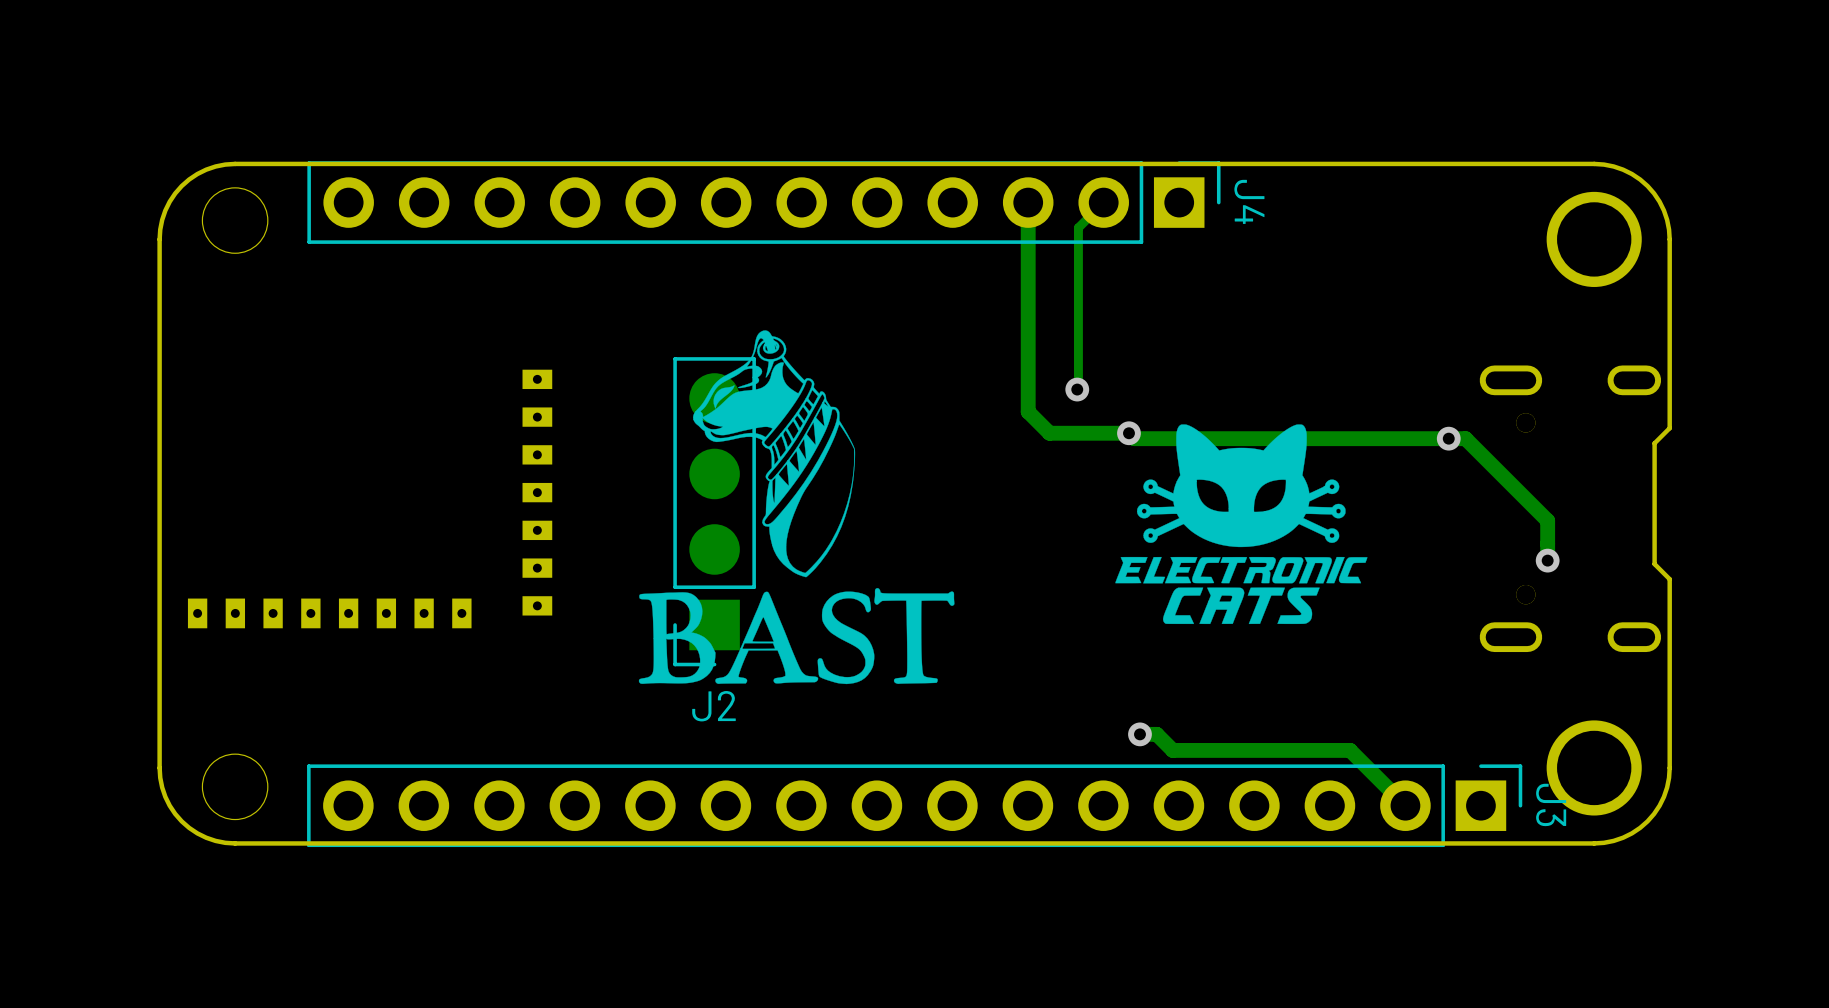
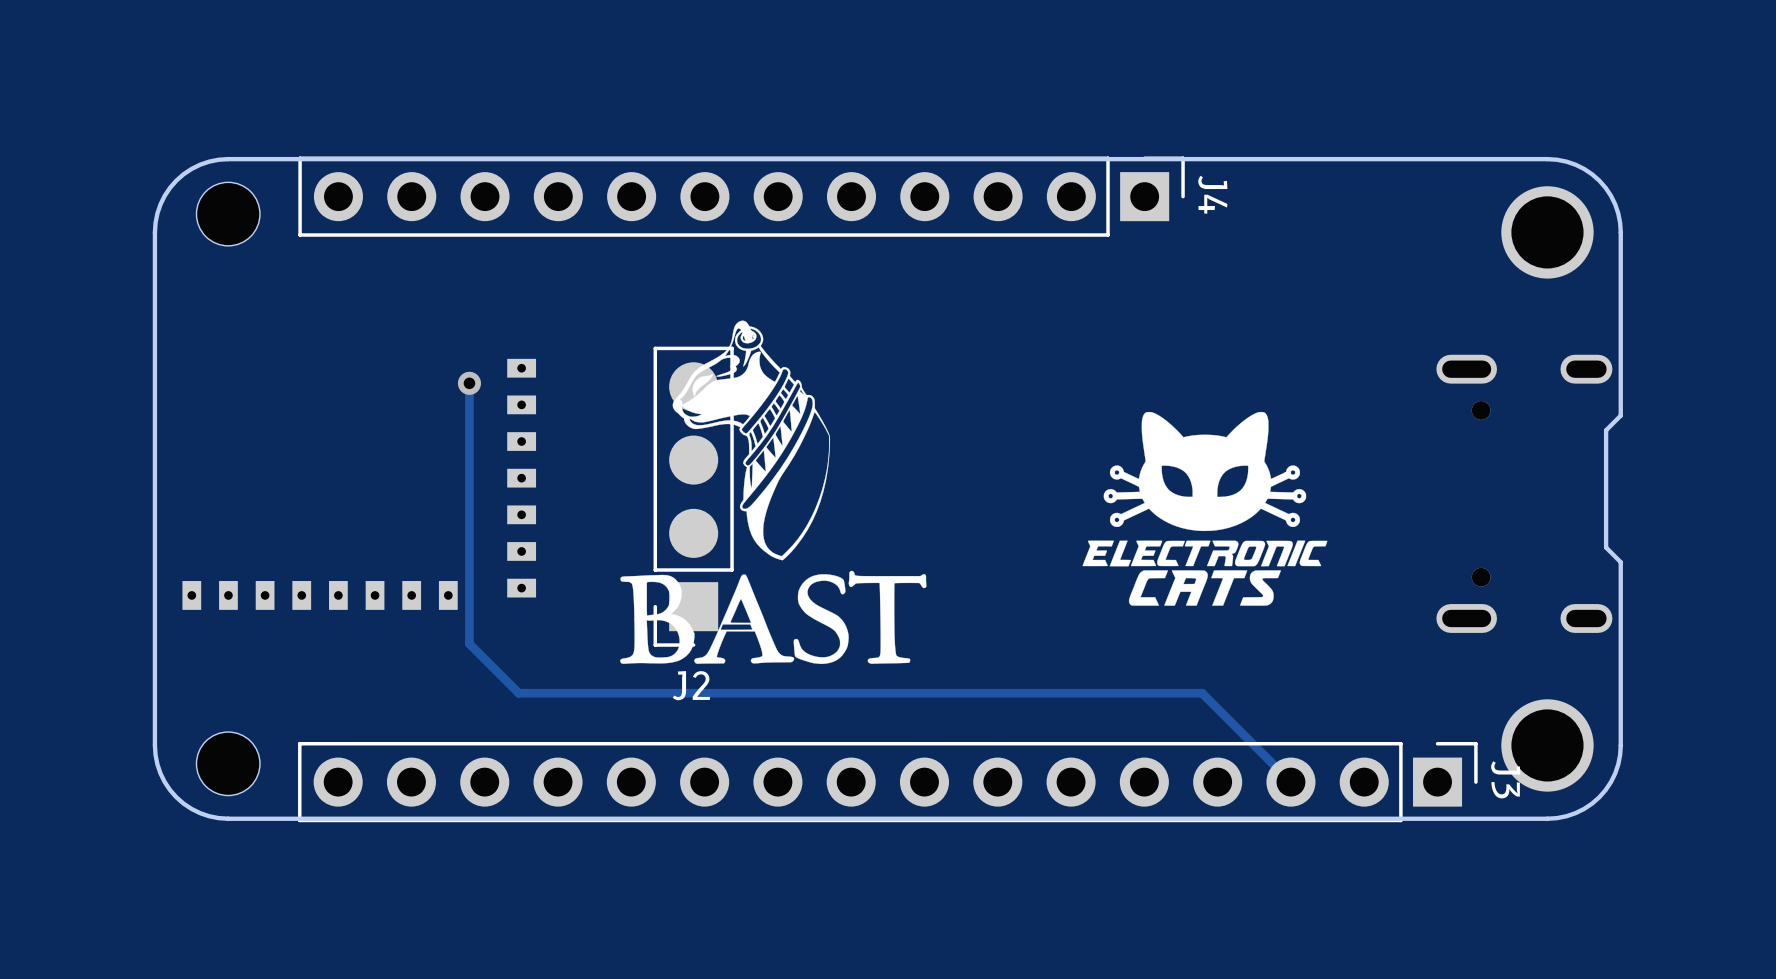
track: (1028, 202) (1028, 411) (1049, 433) (1128, 433) (1134, 438) (1465, 438) (1547, 520) (1547, 560) -> none
track: (1103, 202) (1078, 227) (1077, 389) -> none
via: (1077, 389) -> none
track: none -> (469, 383) (469, 643) (518, 693) (1202, 693) (1290, 782)
via: none -> (469, 383)
via: (1128, 433) -> none
via: (1448, 438) -> none
via: (1547, 560) -> none
track: (1139, 734) (1156, 734) (1172, 750) (1350, 750) (1405, 805) -> none
via: (1139, 734) -> none

